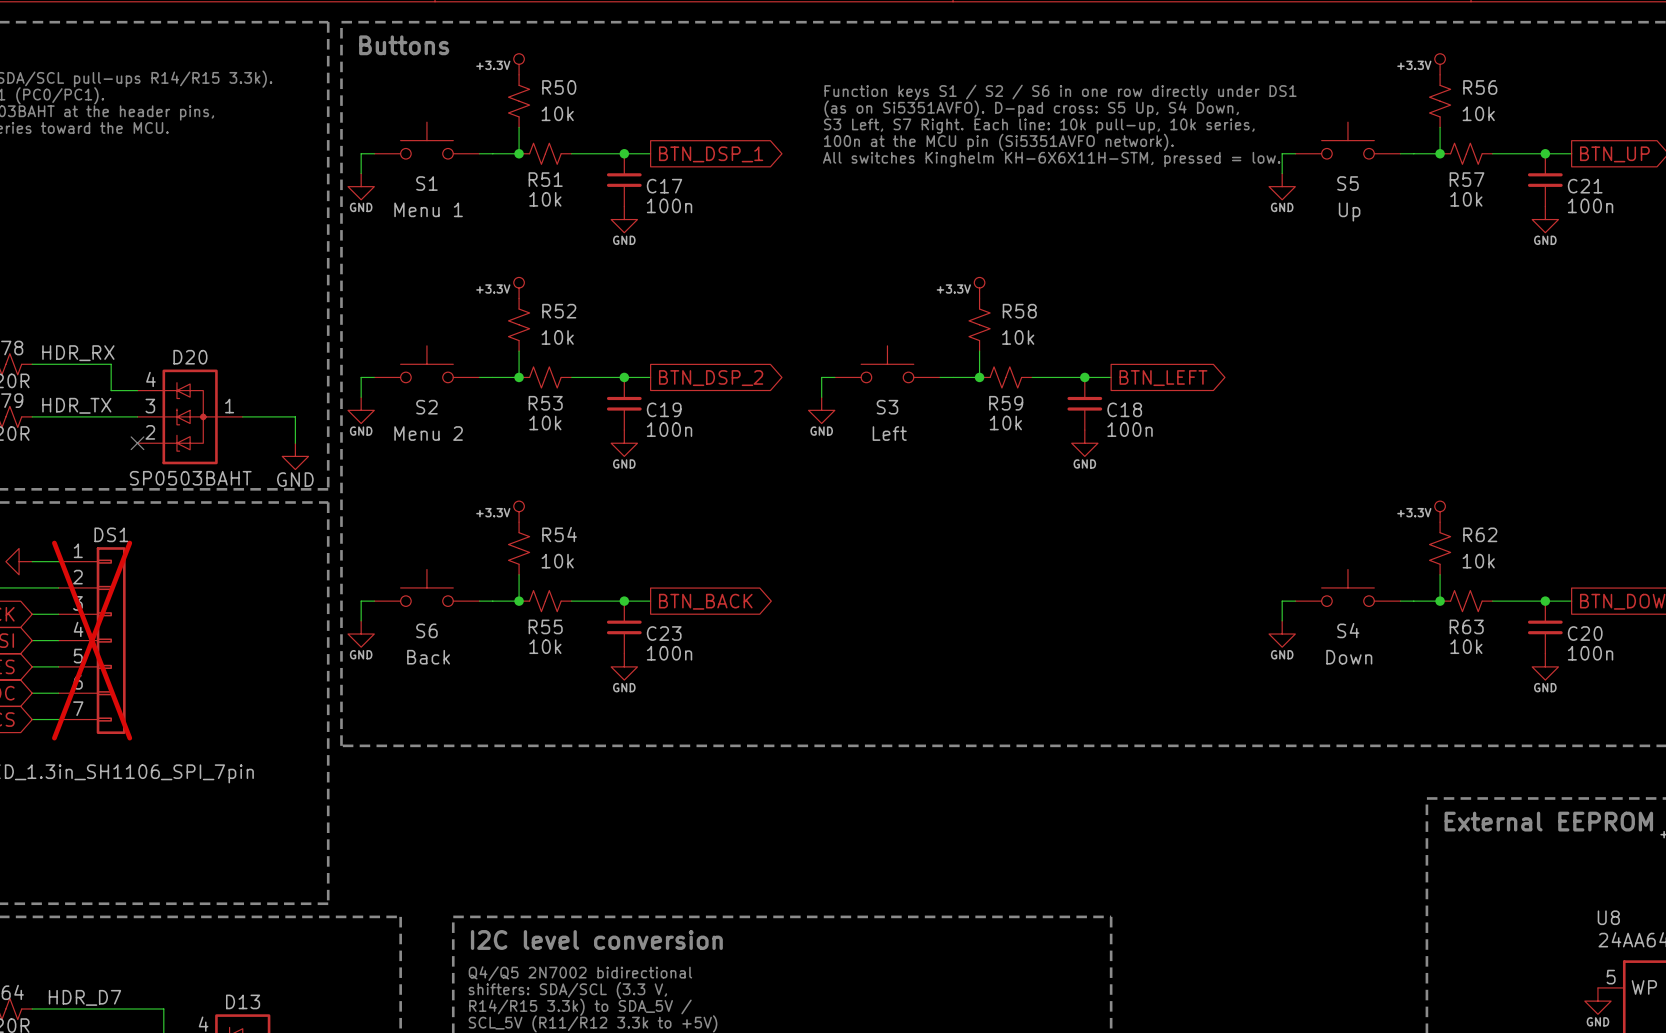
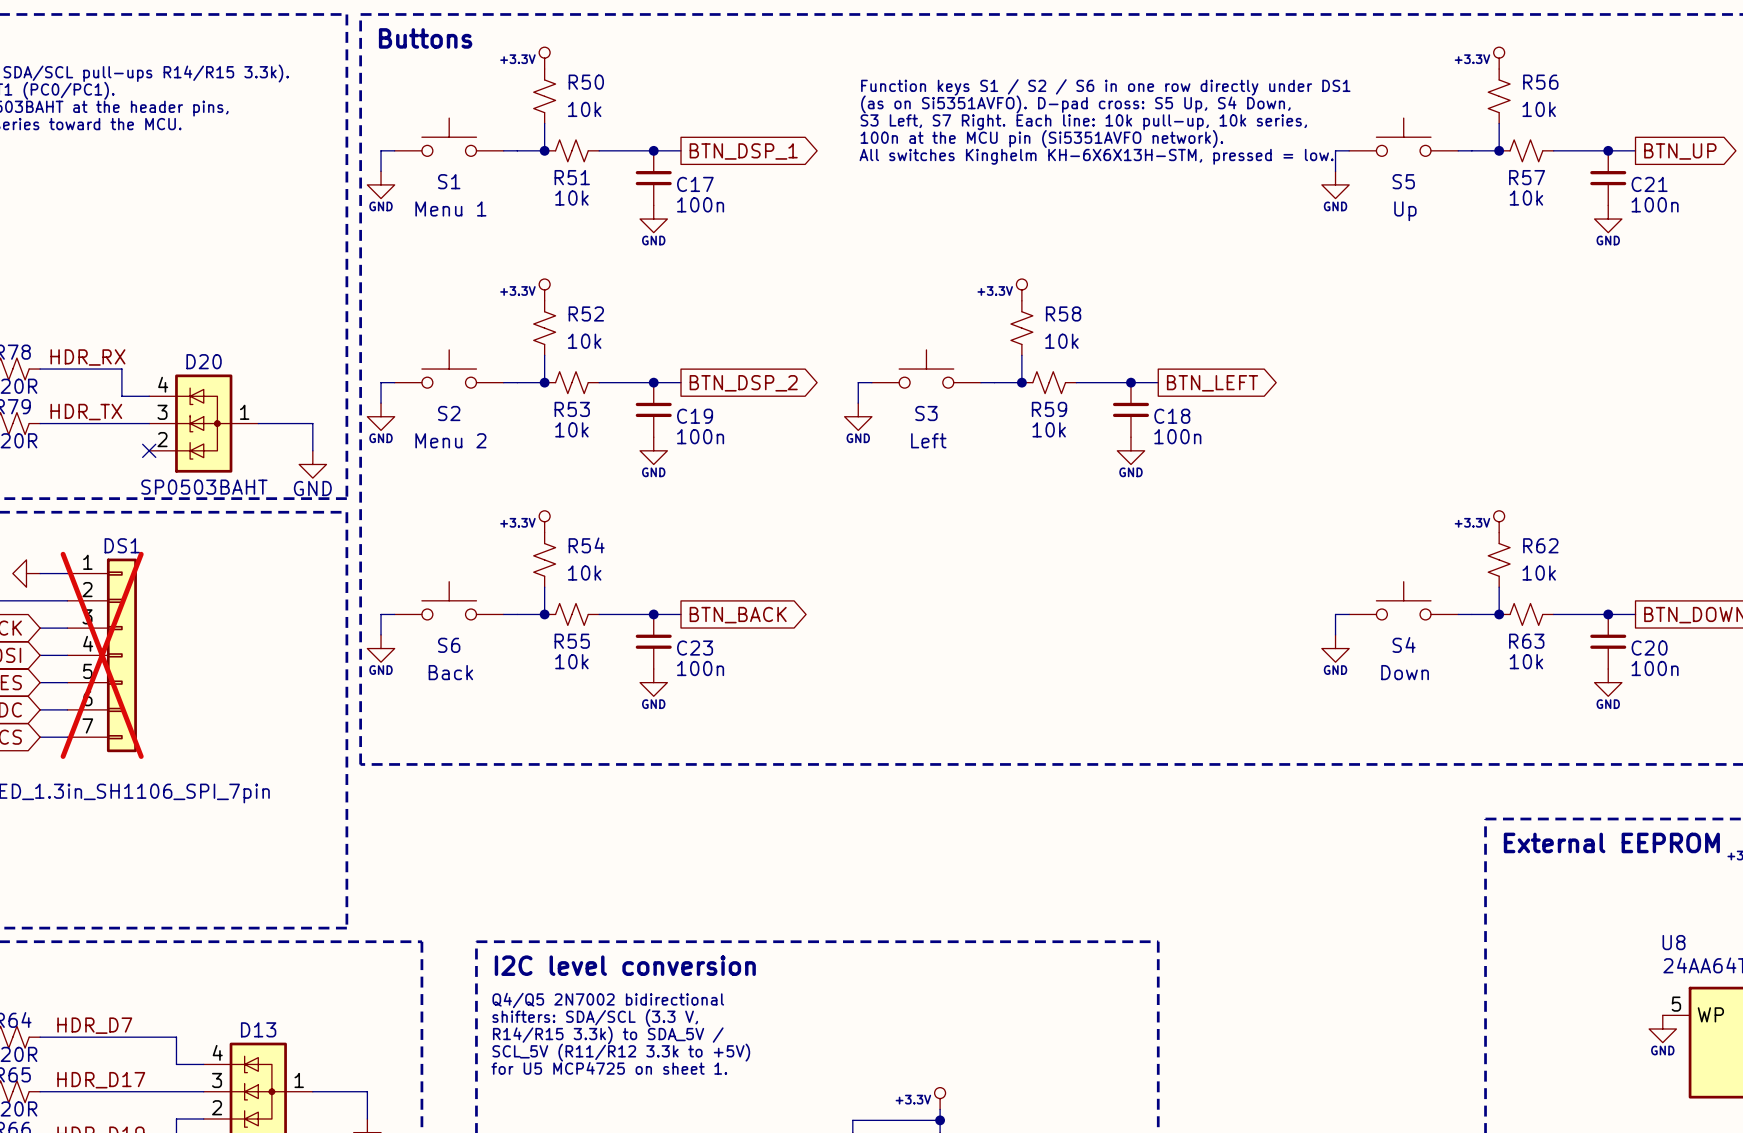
text: All switches Kinghelm KH-6X6X11H-STM, pressed = low. (1051, 159) -> All switches Kinghelm KH-6X6X13H-STM, pressed = low. (1096, 156)

